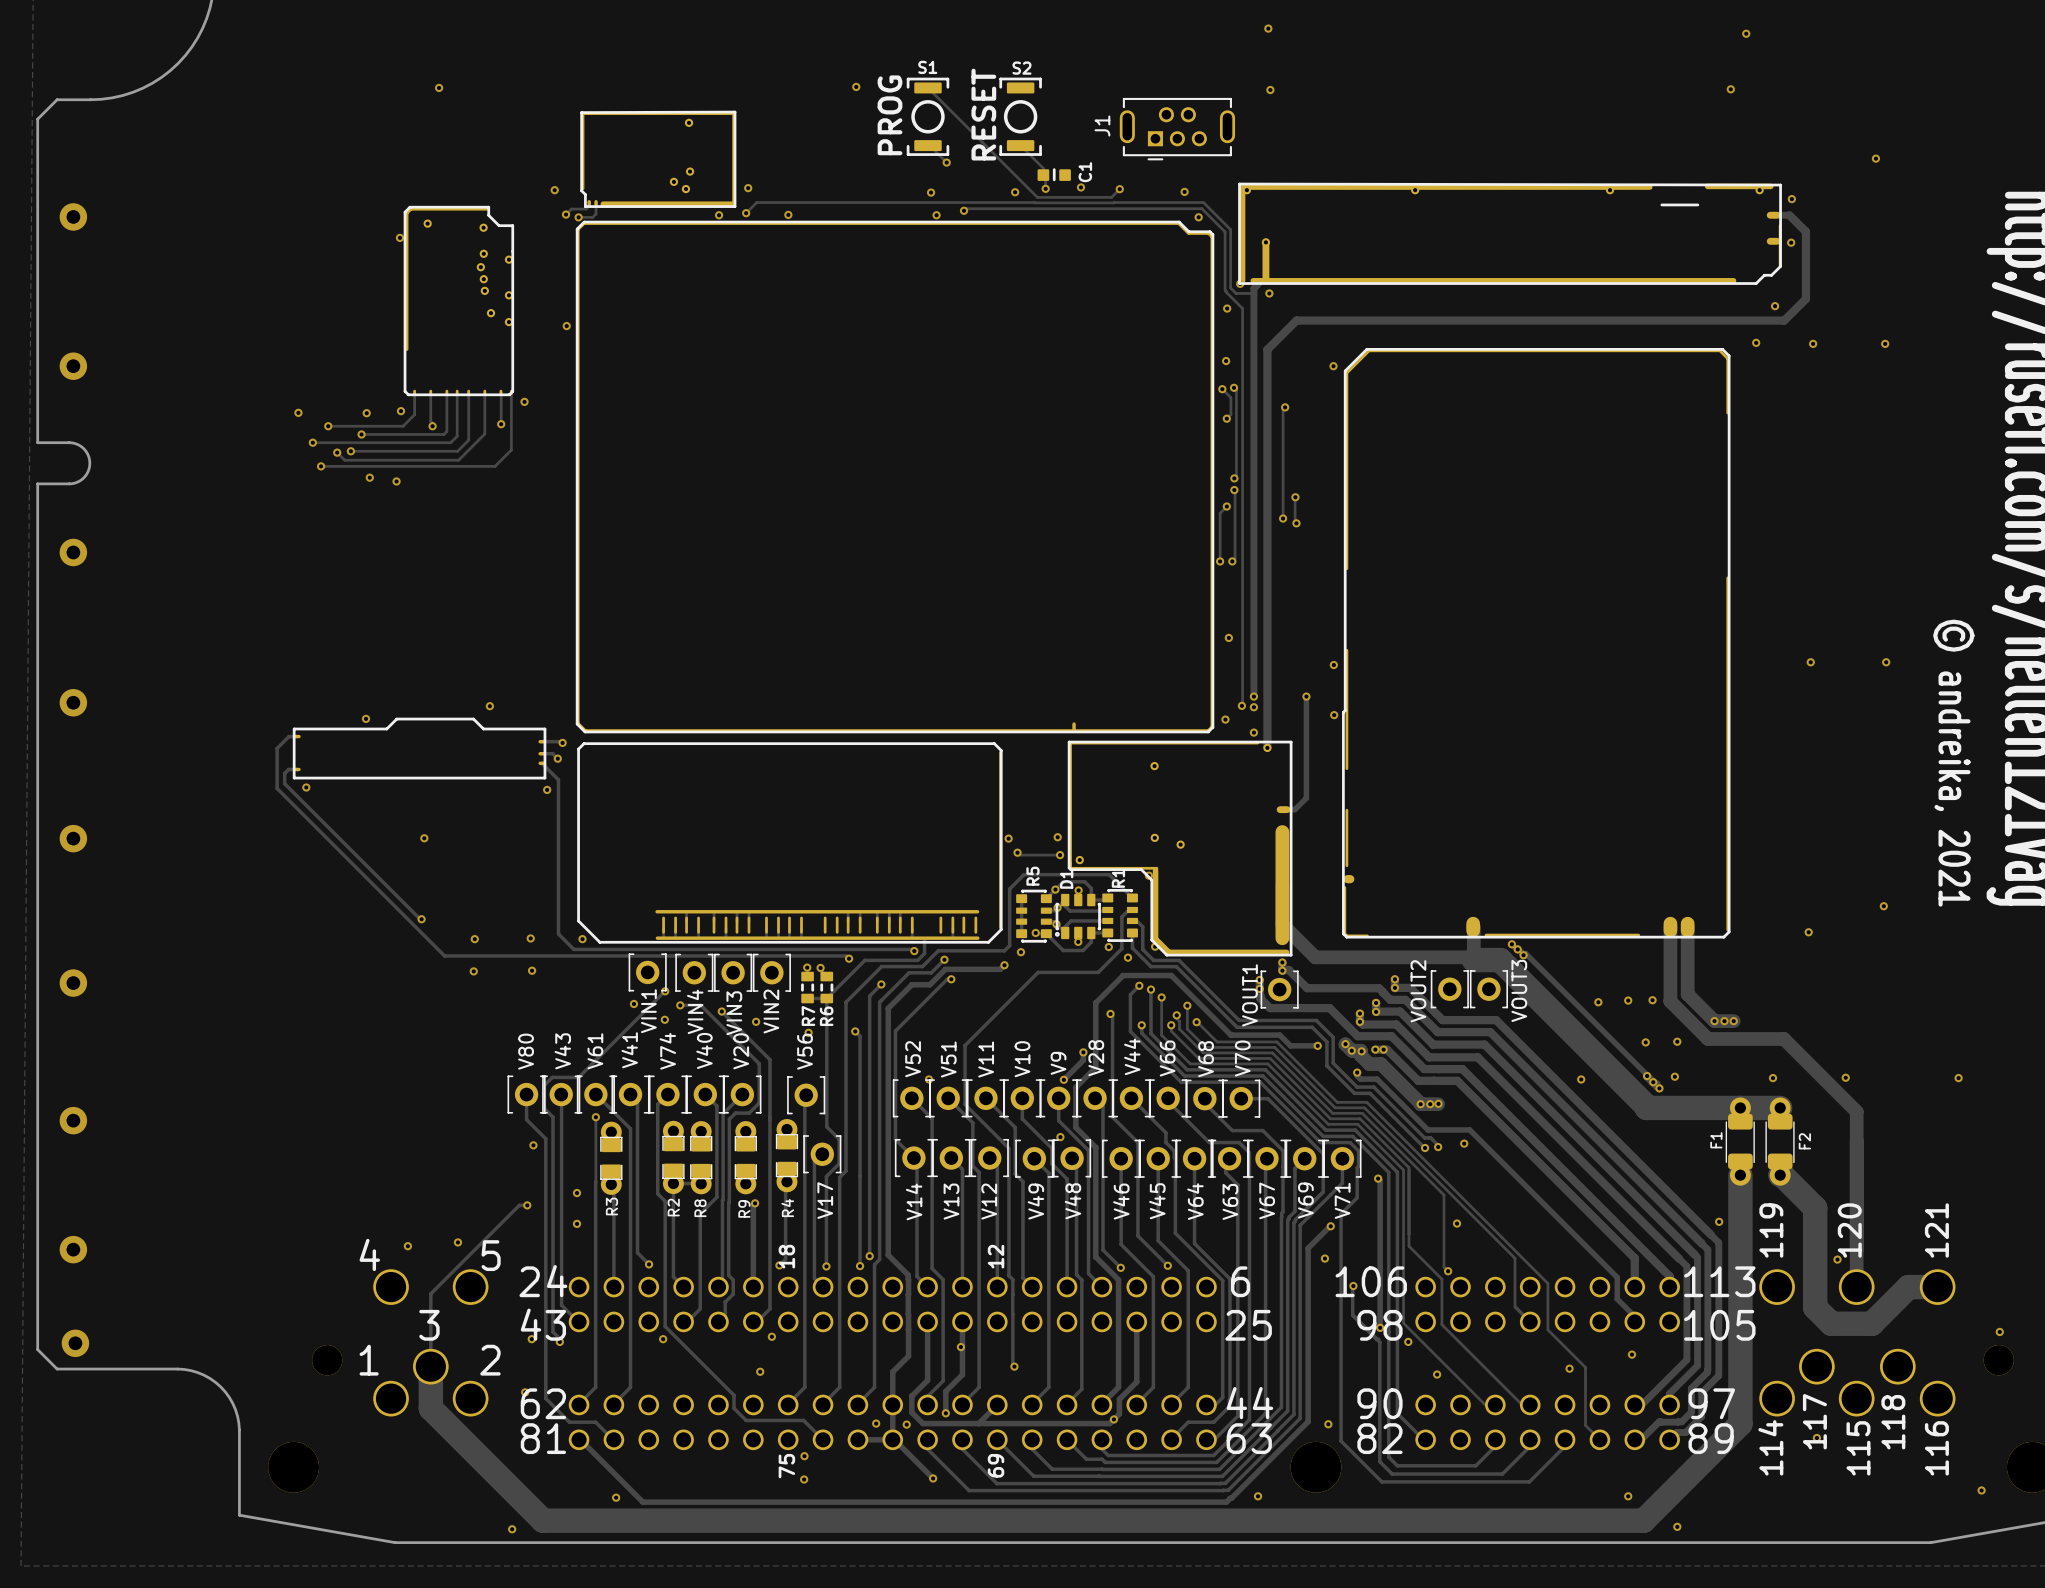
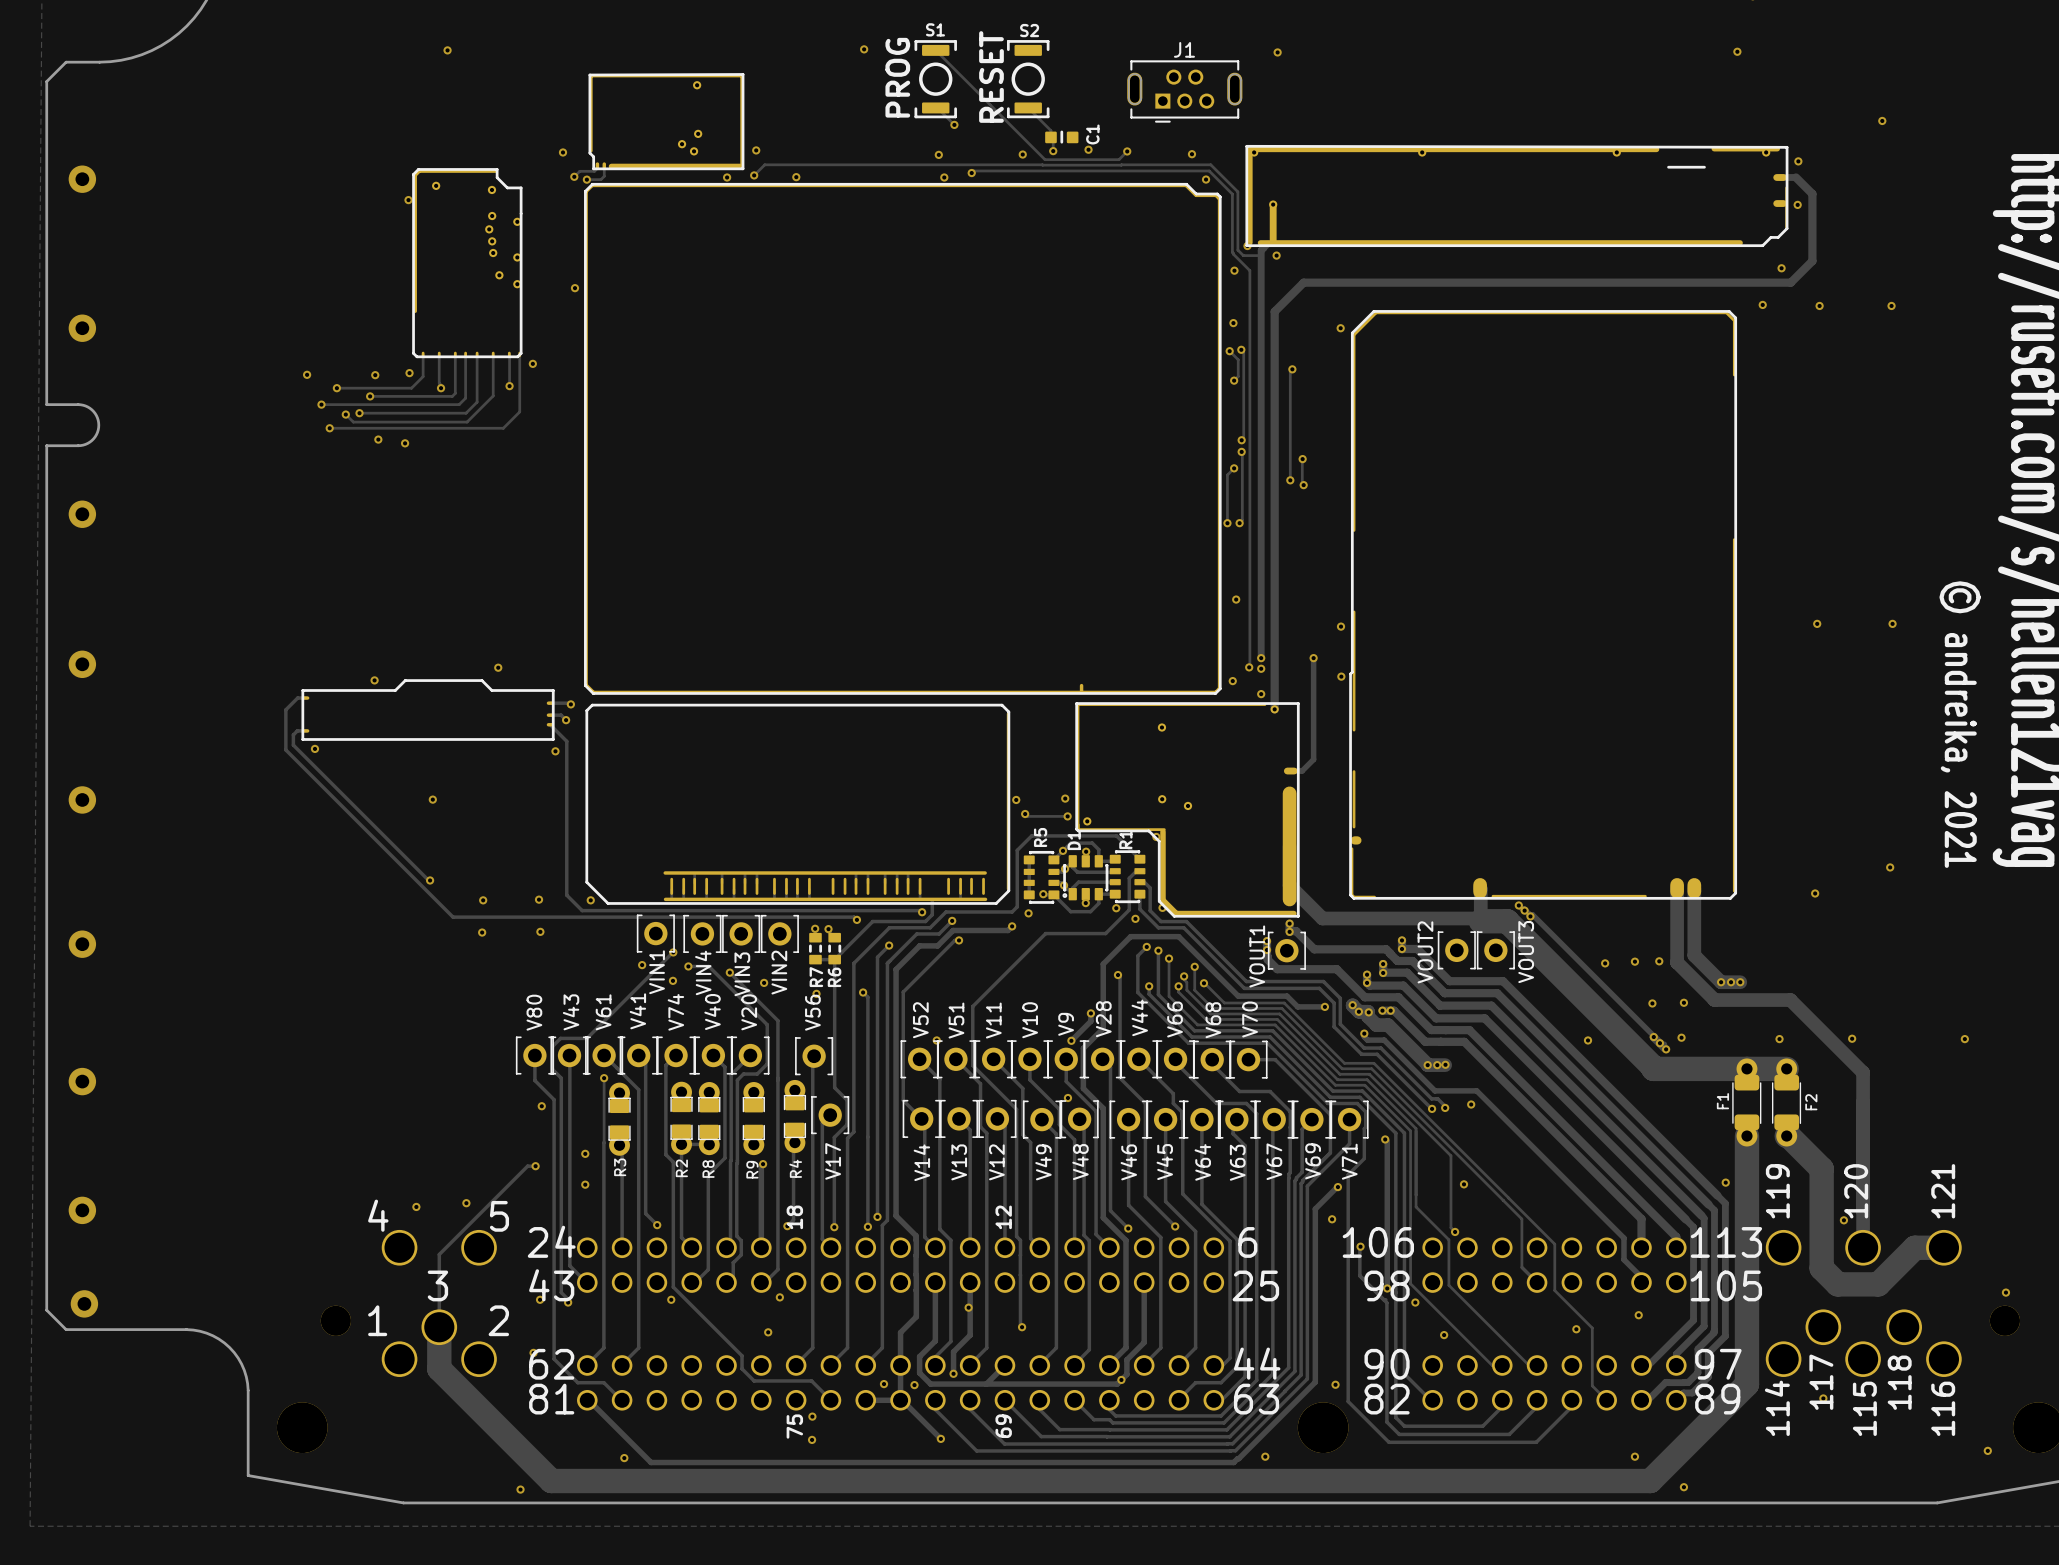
J1 footprint: [1119, 97, 1236, 161] -> [1127, 60, 1243, 123]
J1 name position: J1 (1102, 126) -> J1 (1184, 49)

